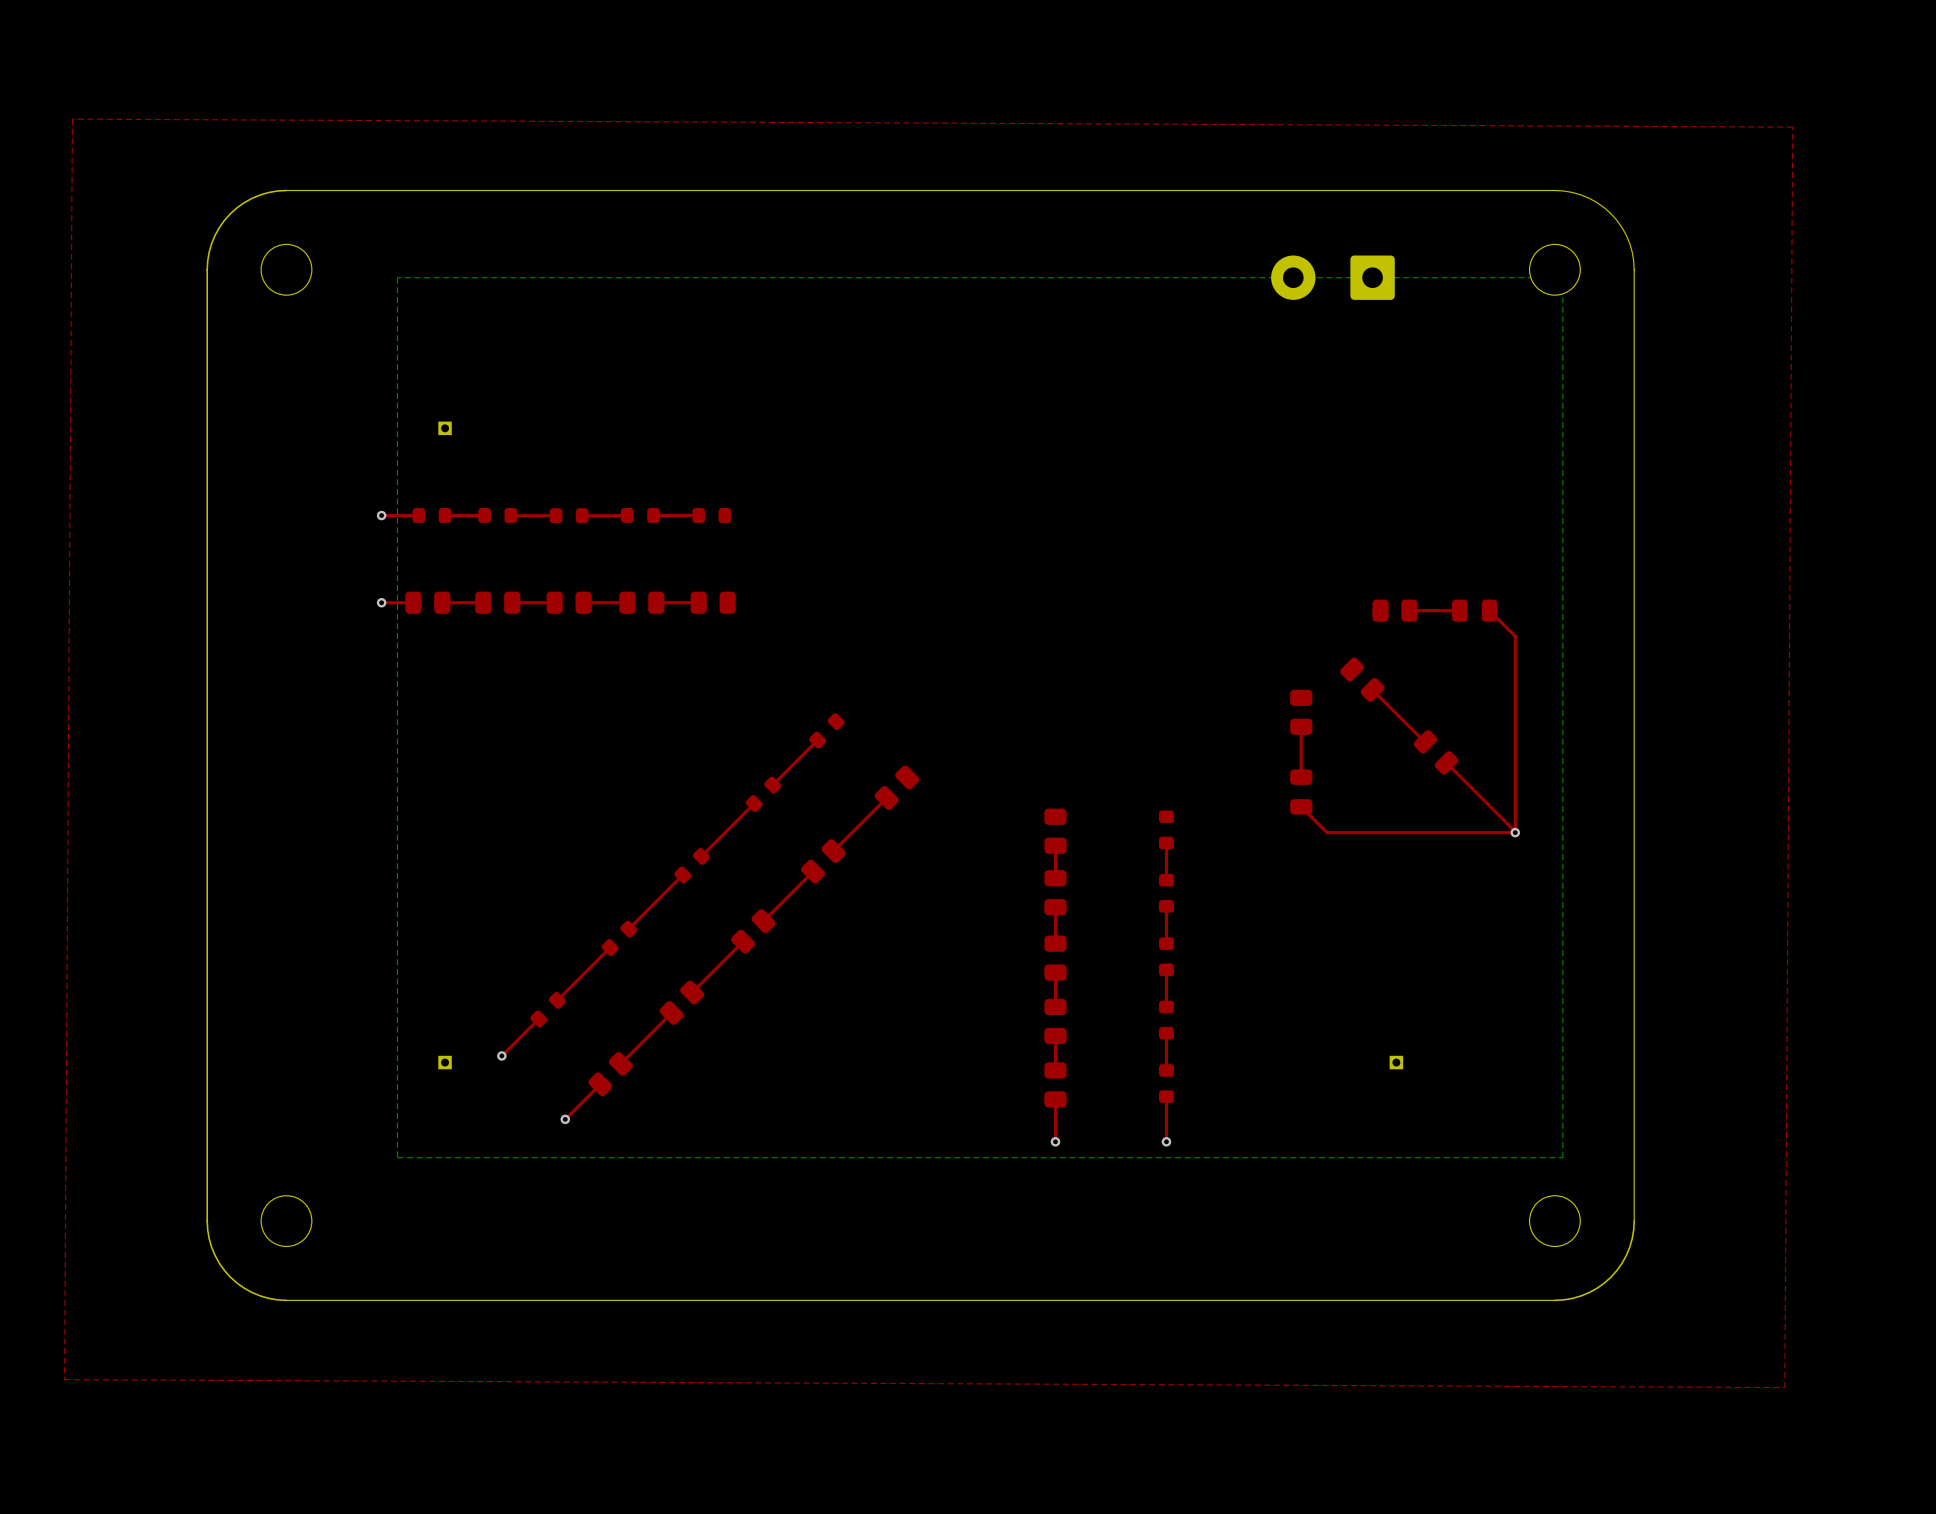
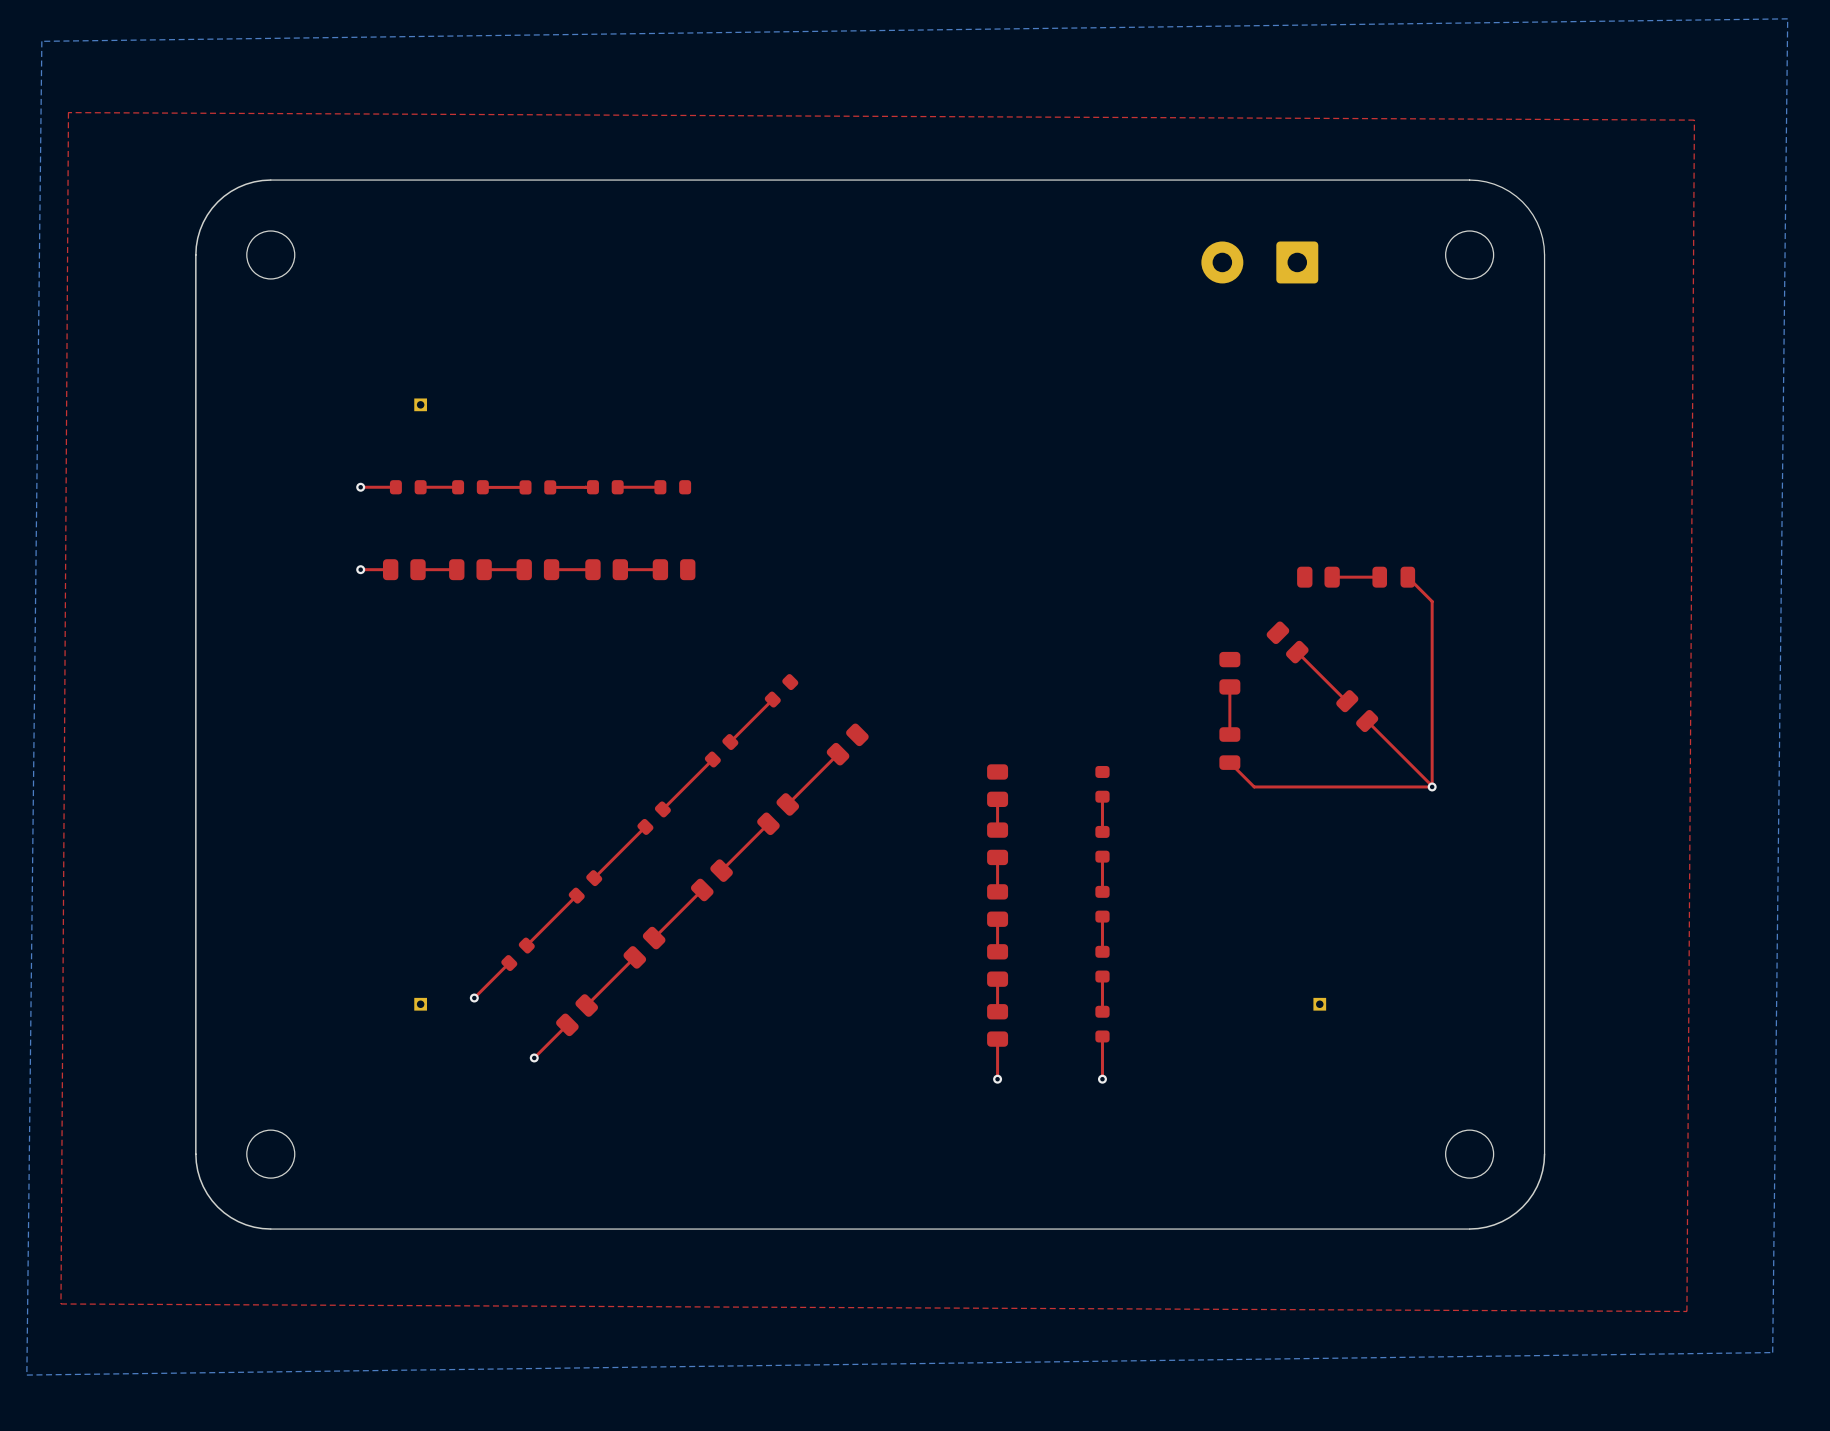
bottom zone outline: none -> (1787, 18) (41, 41) (26, 1375) (1772, 1352) (1787, 18)
bottom zone outline: (1562, 277) (397, 277) (397, 1157) (1562, 1157) (1562, 277) -> none

